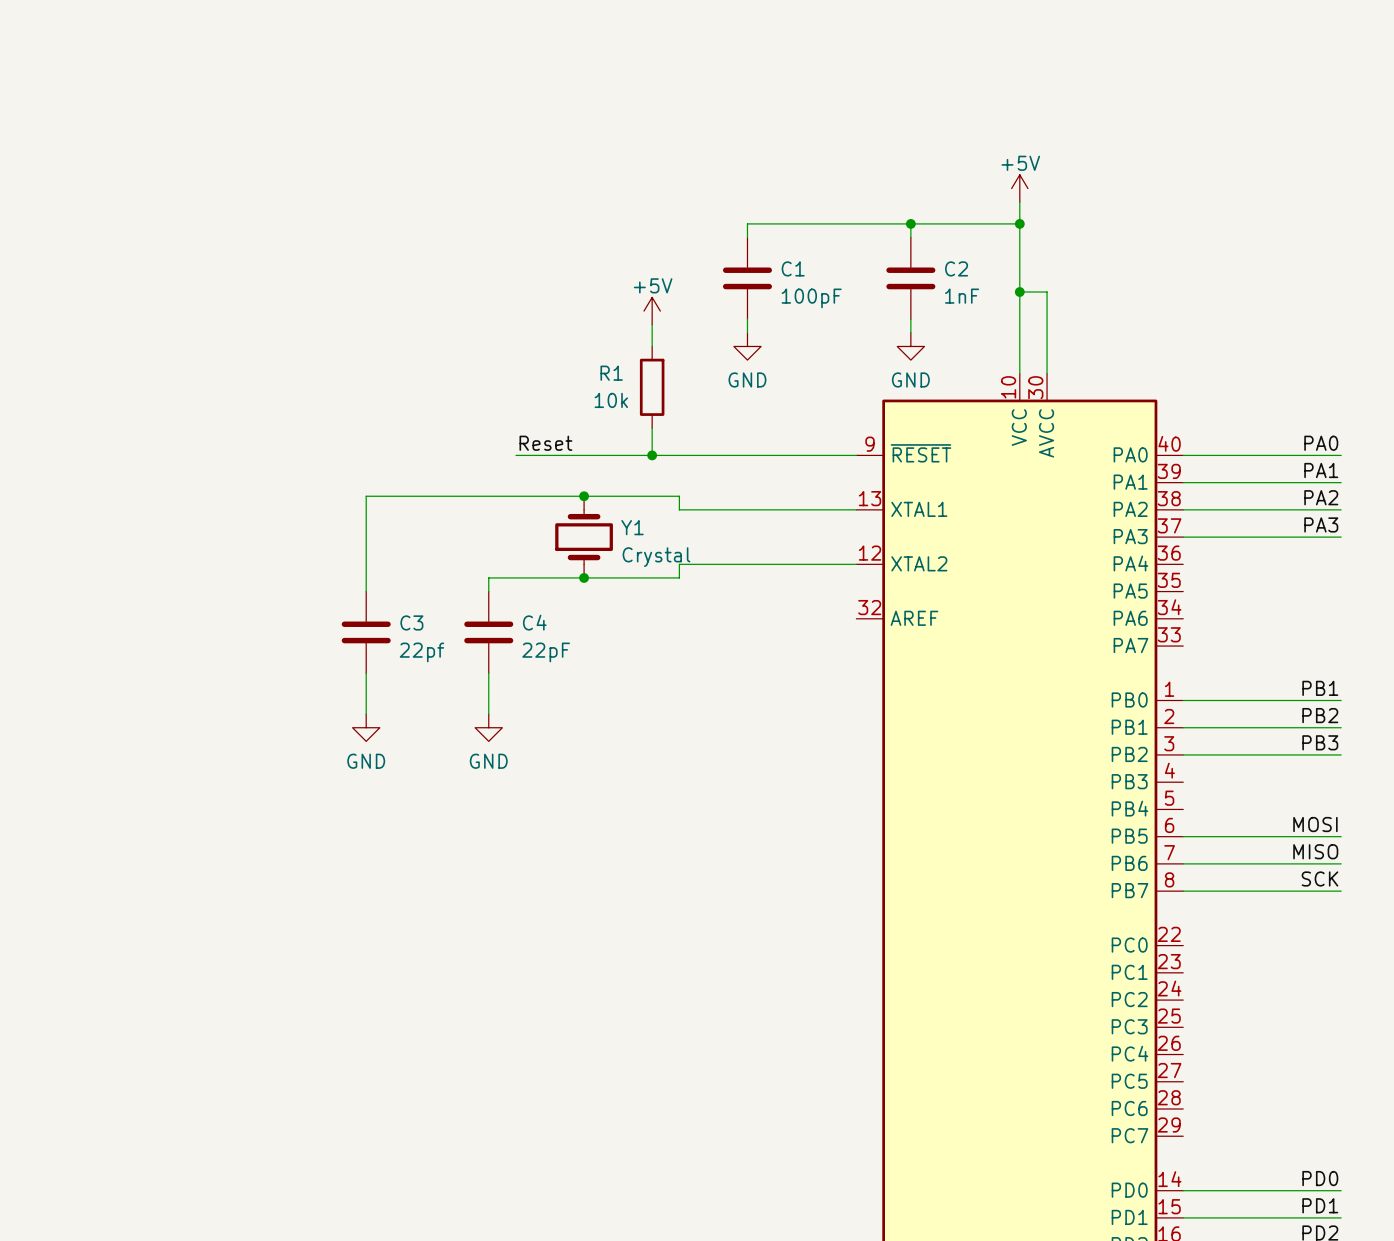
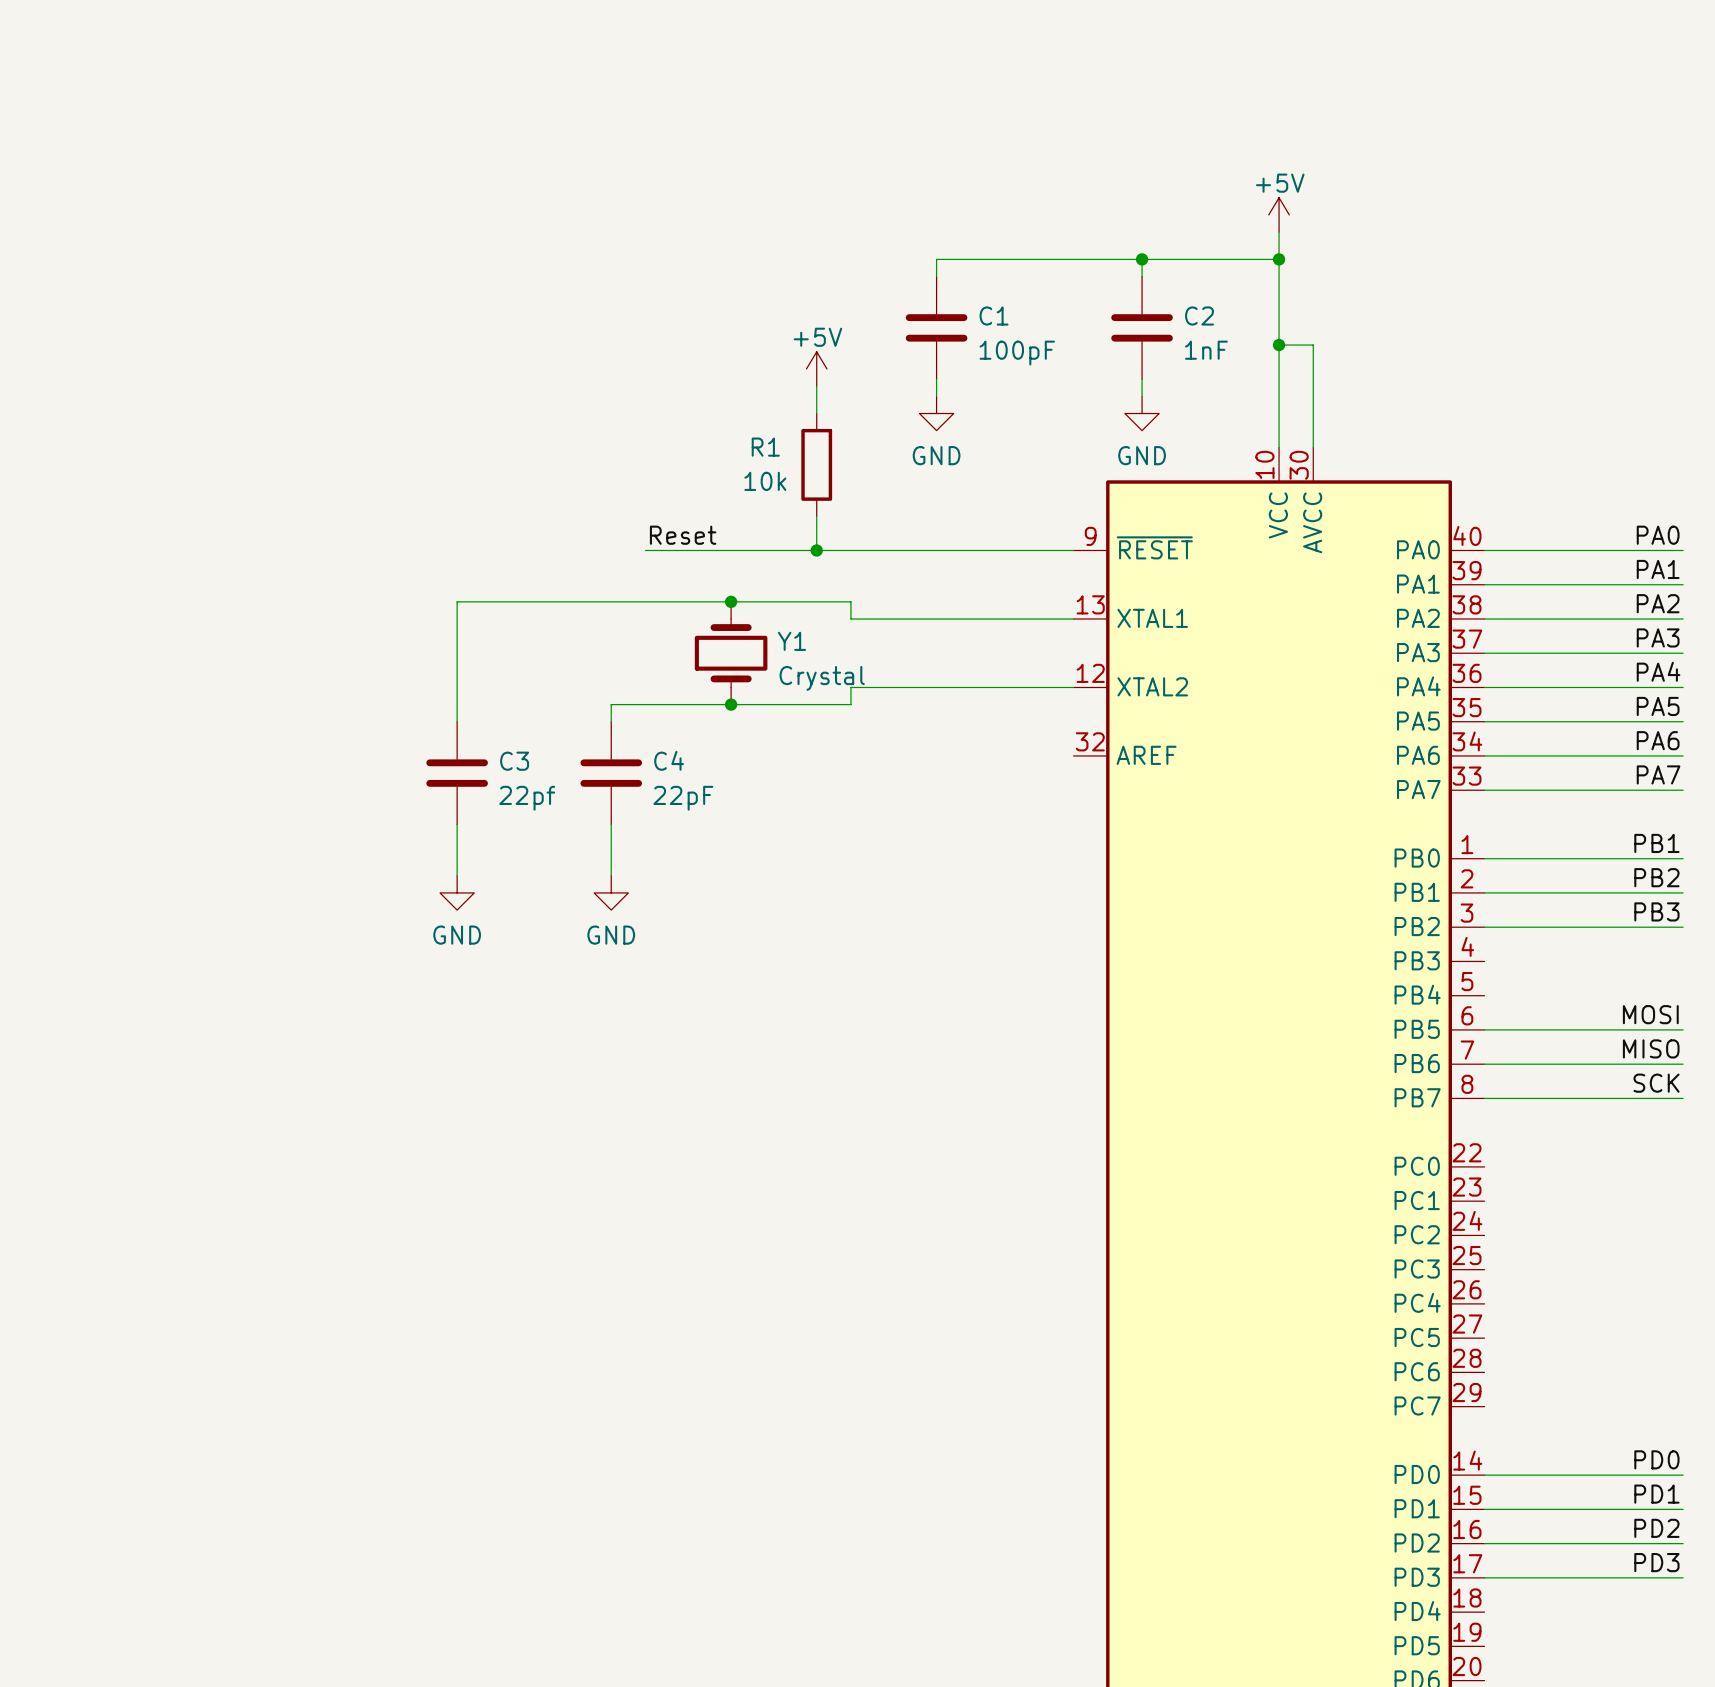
label: none -> PA4 (1658, 671)
wire: none -> (1484, 687) (1683, 687)
label: none -> PA5 (1658, 706)
wire: none -> (1484, 721) (1683, 721)
label: none -> PA6 (1658, 740)
wire: none -> (1484, 755) (1683, 755)
label: none -> PA7 (1658, 774)
wire: none -> (1484, 790) (1683, 790)

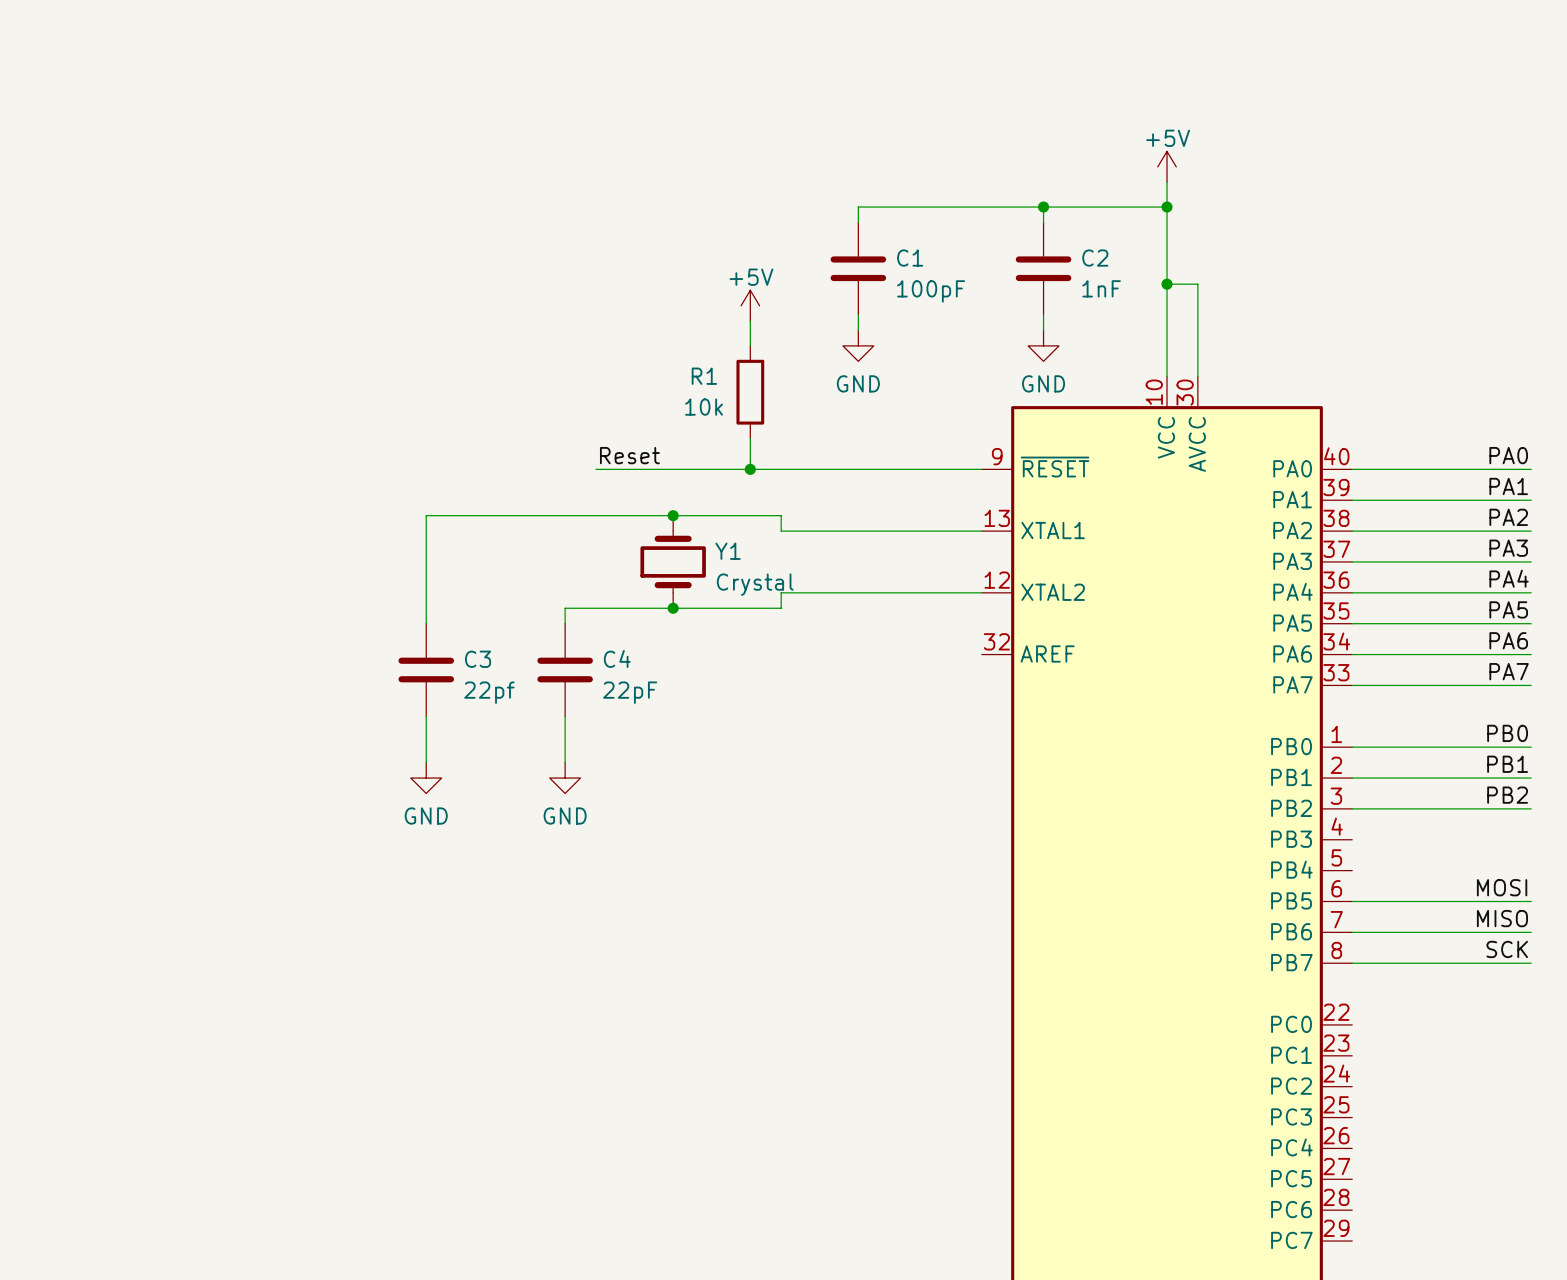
label: PB1 (1656, 843) -> PB0 (1507, 733)
label: PB2 (1656, 877) -> PB1 (1507, 764)
label: PB3 (1656, 911) -> PB2 (1507, 795)

